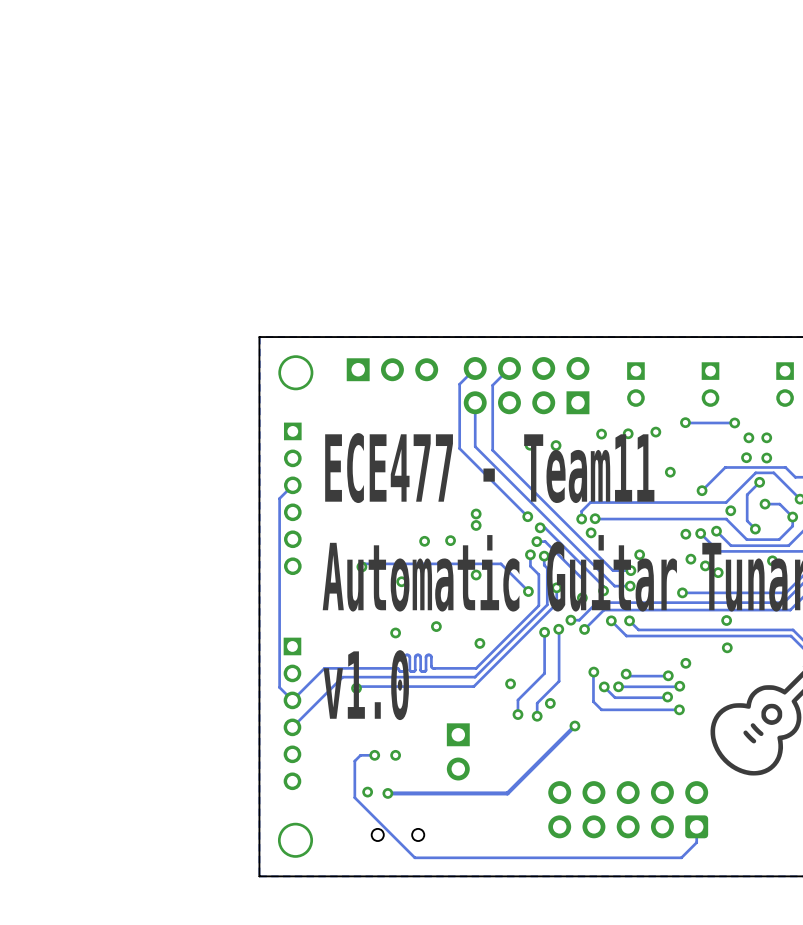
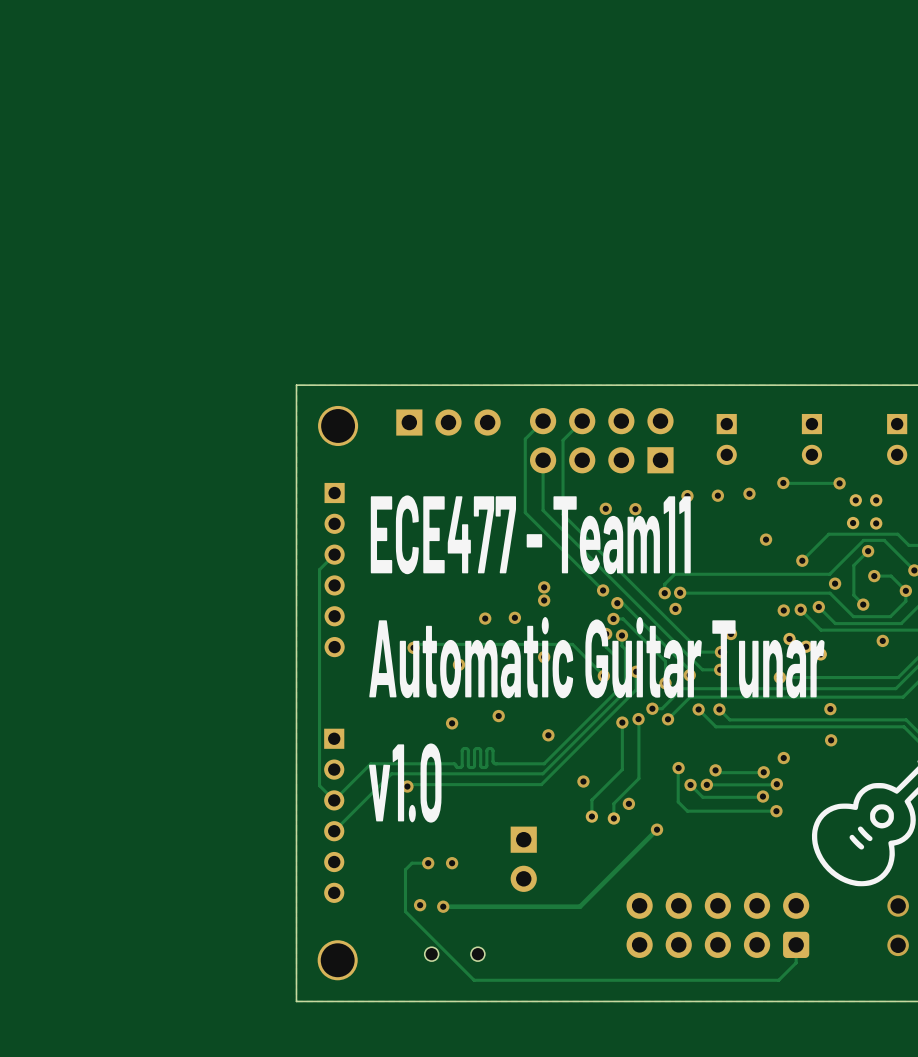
via: none -> (898, 905)
via: none -> (898, 945)

